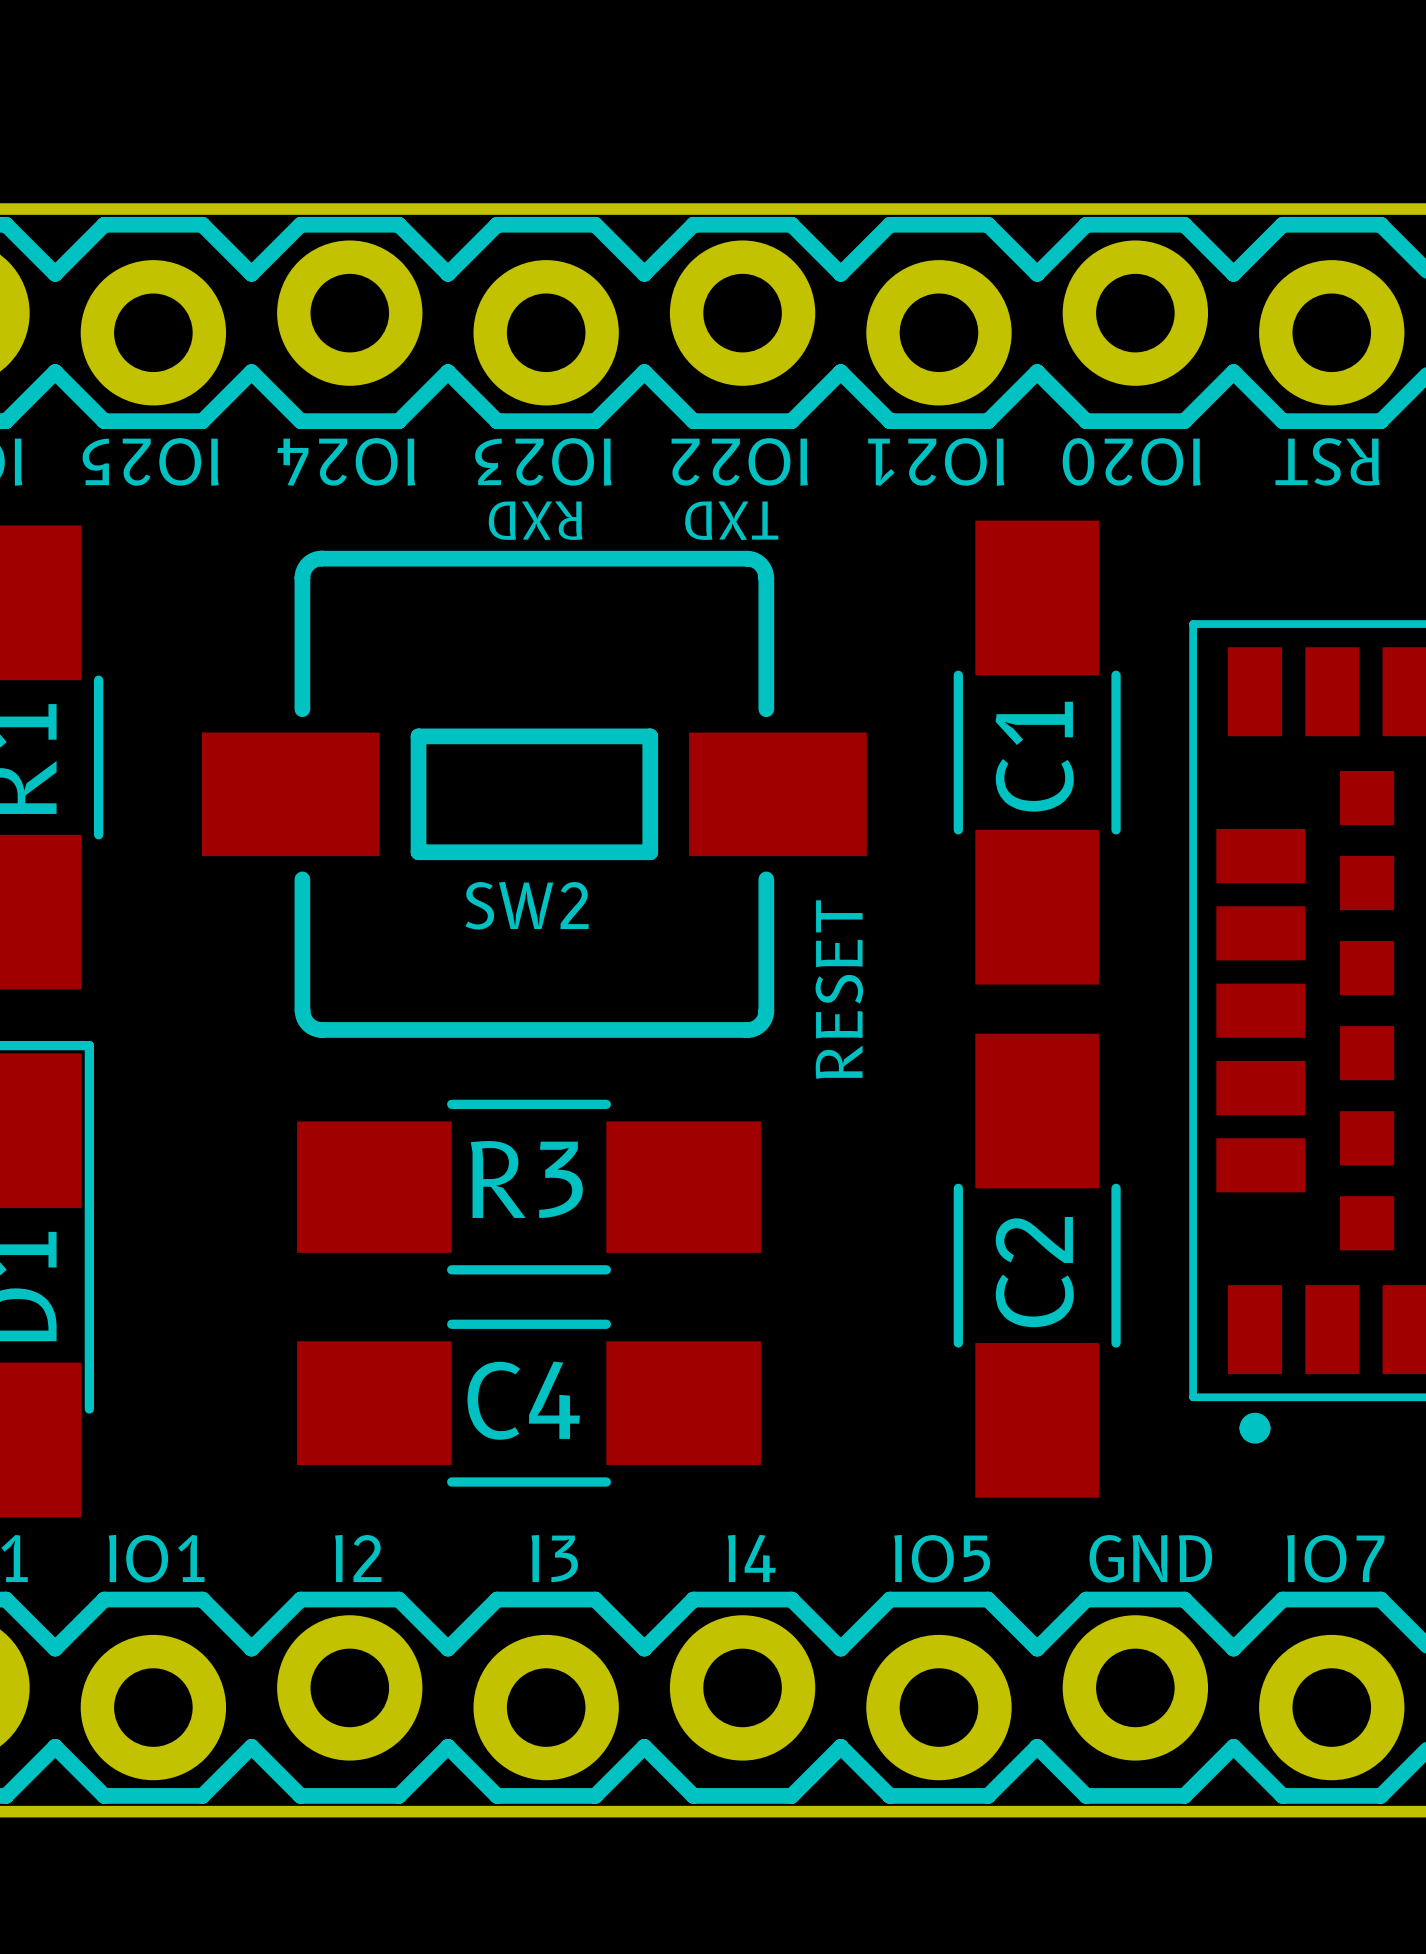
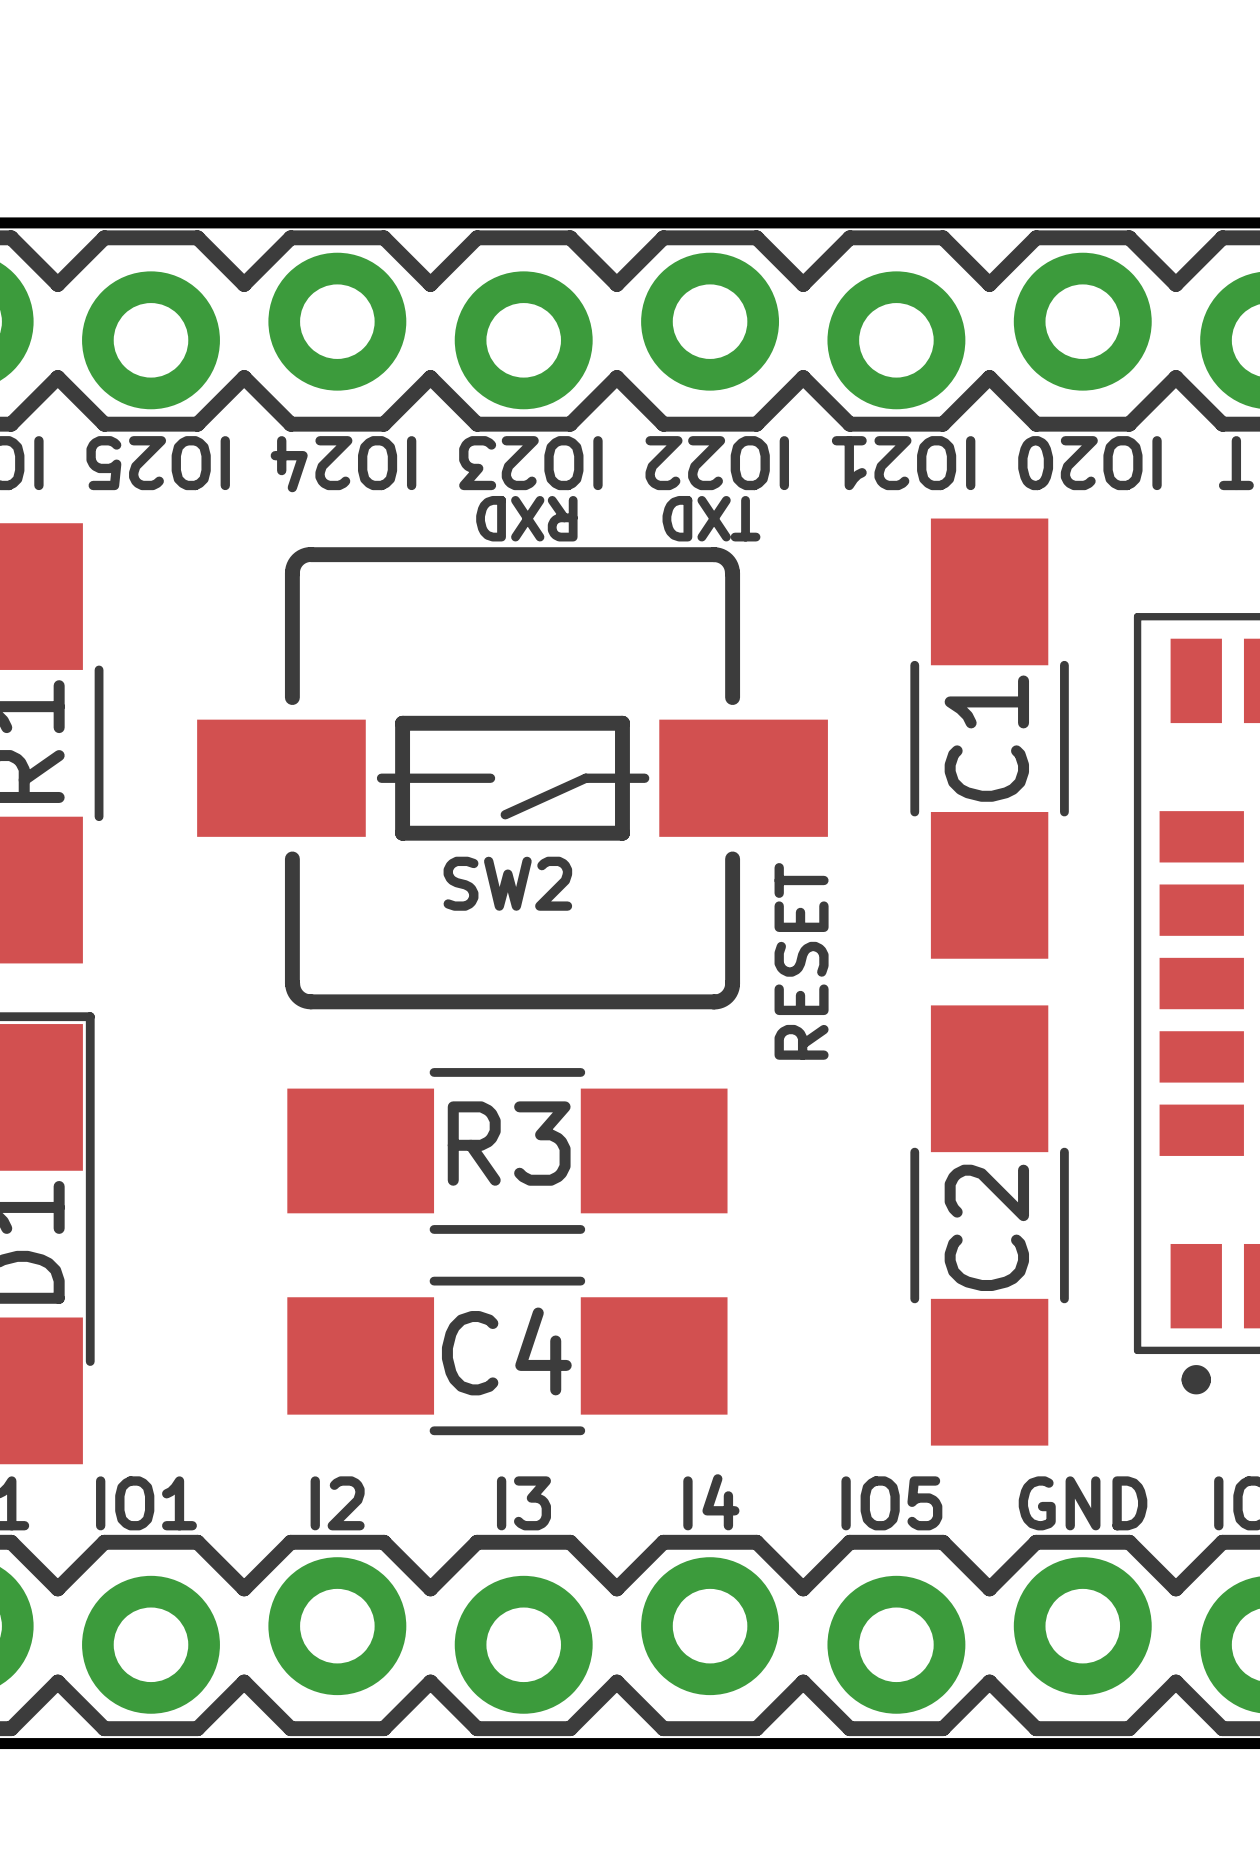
SW2 footprint: [201, 550, 867, 1039] -> [197, 547, 828, 1010]

